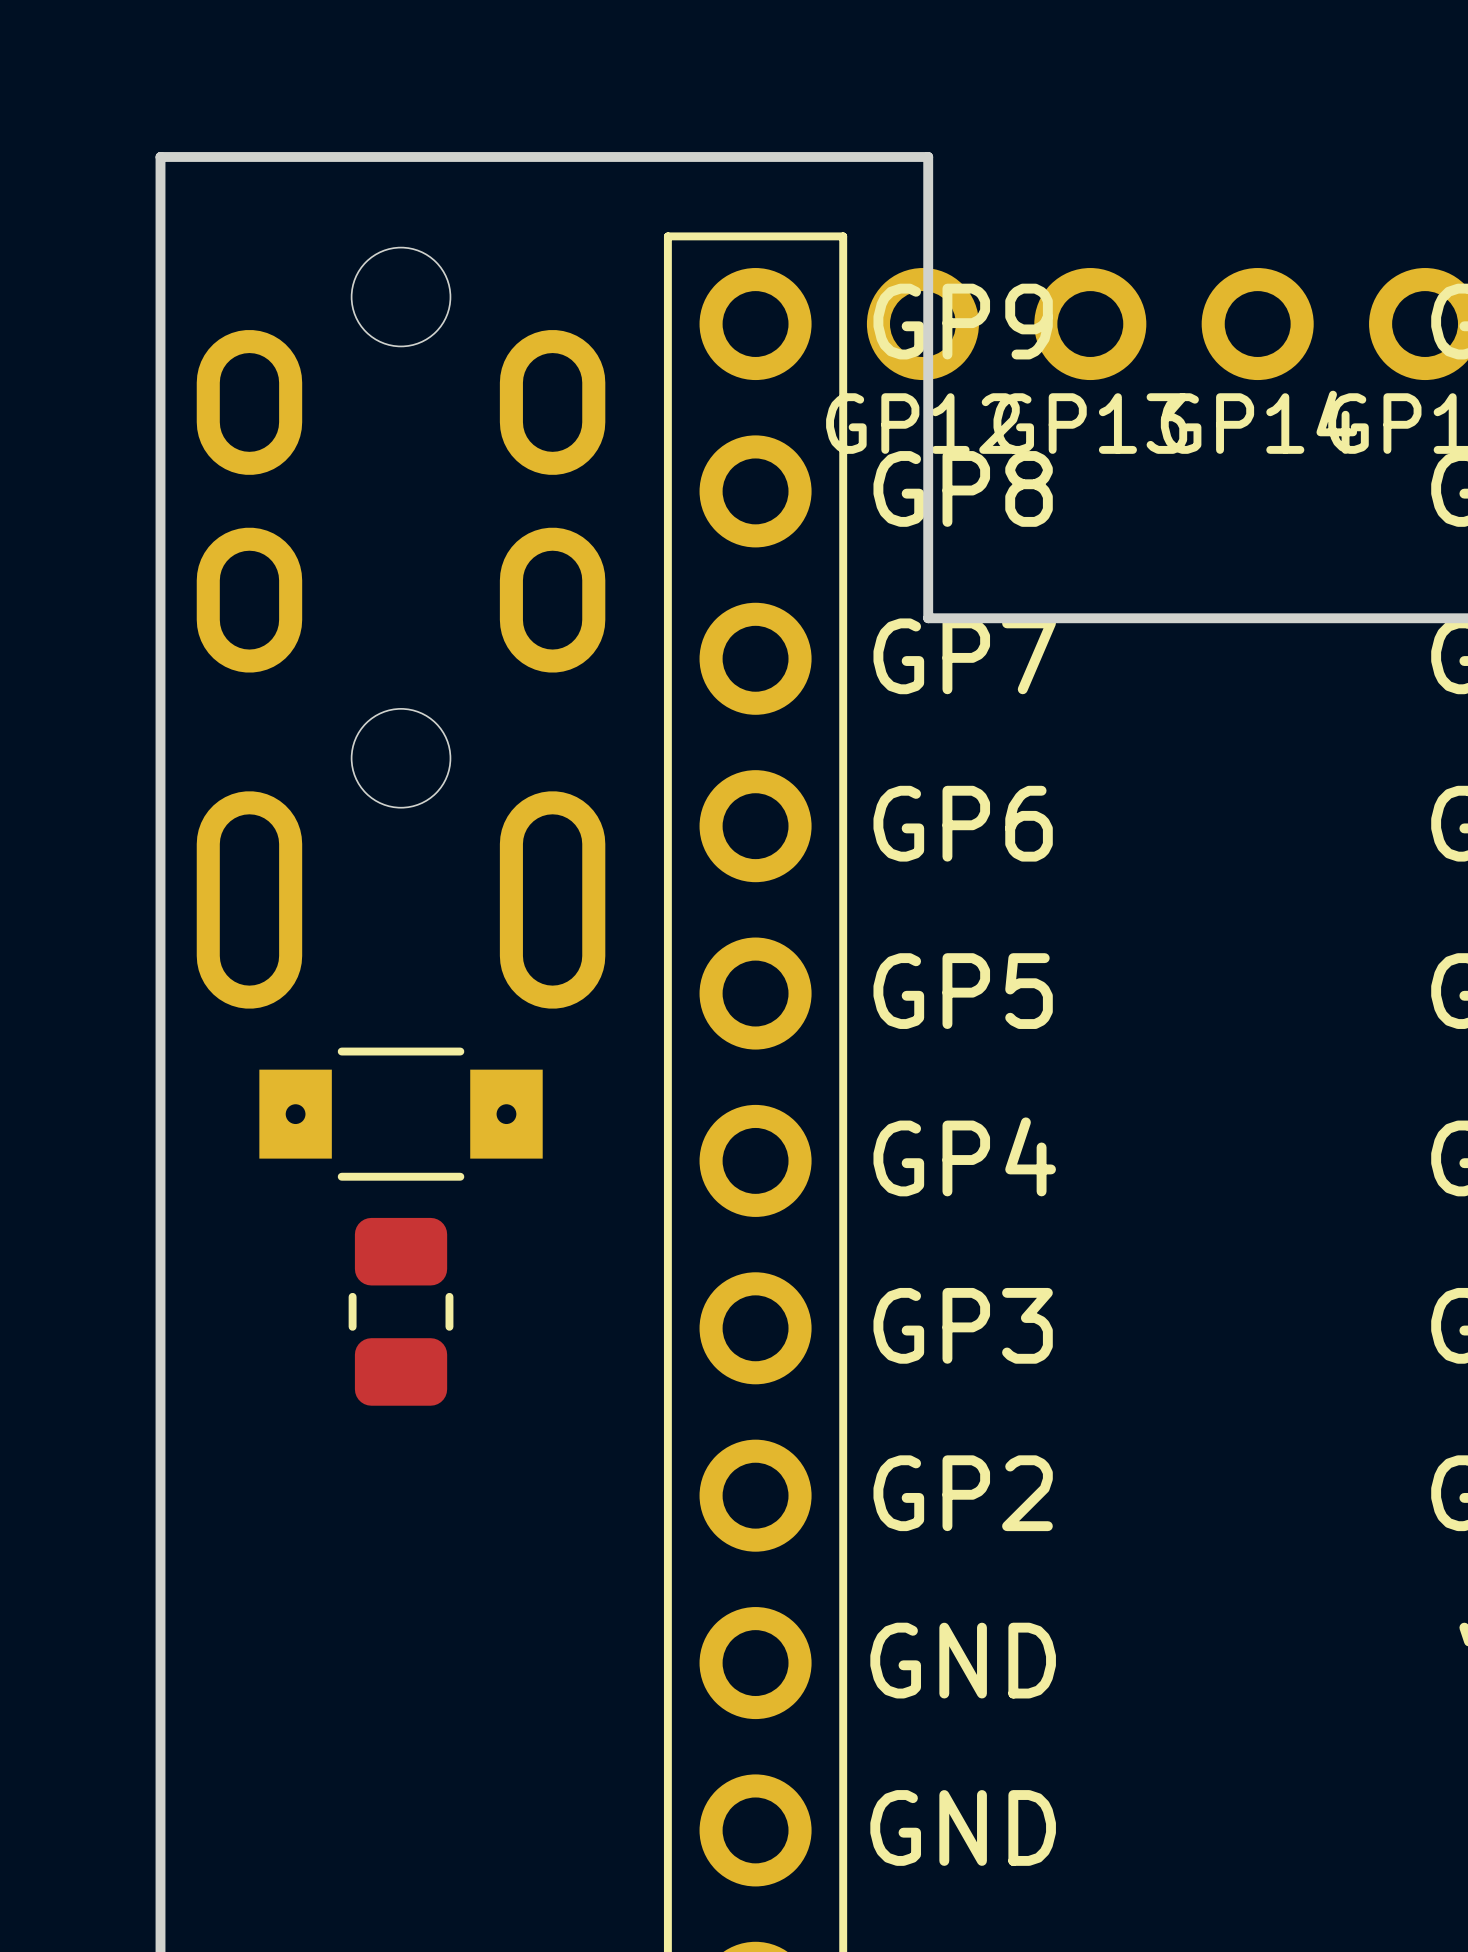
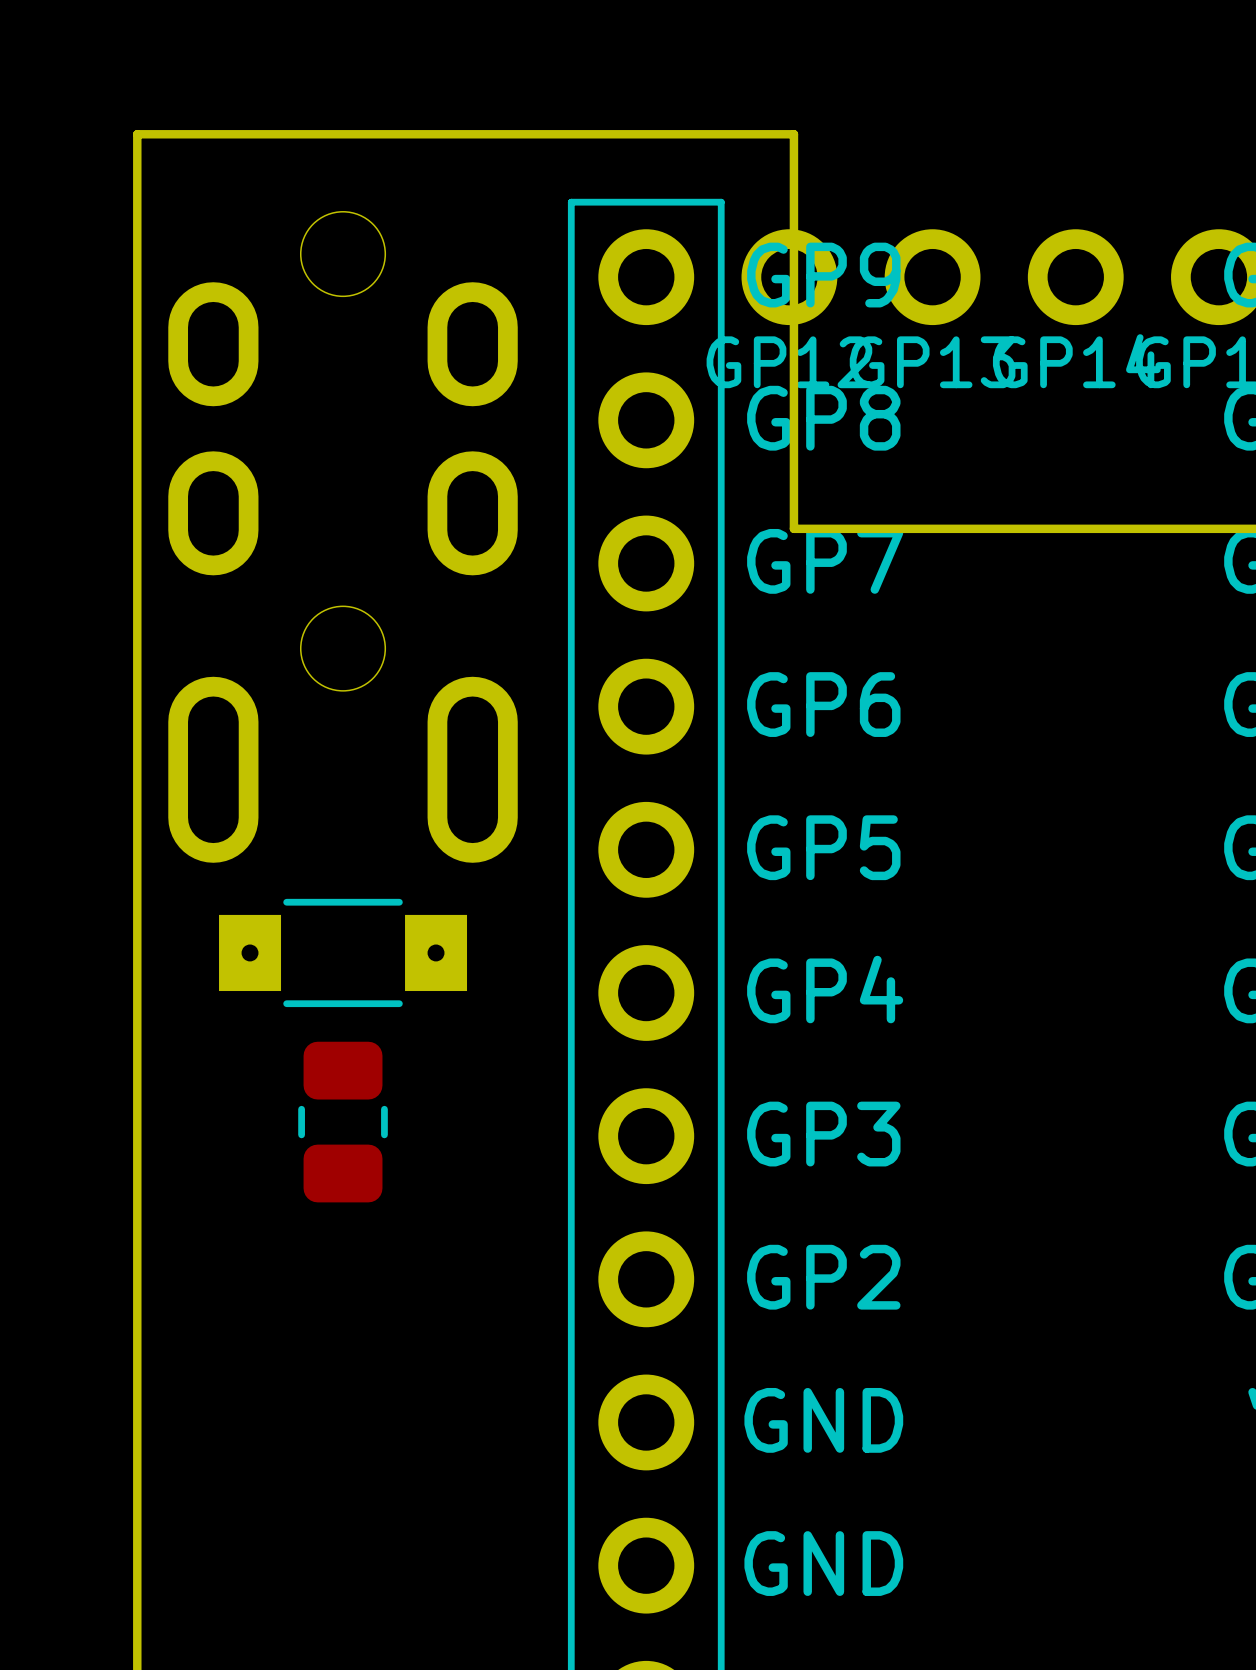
part footprint: [259, 1047, 543, 1181] -> [219, 898, 468, 1008]

